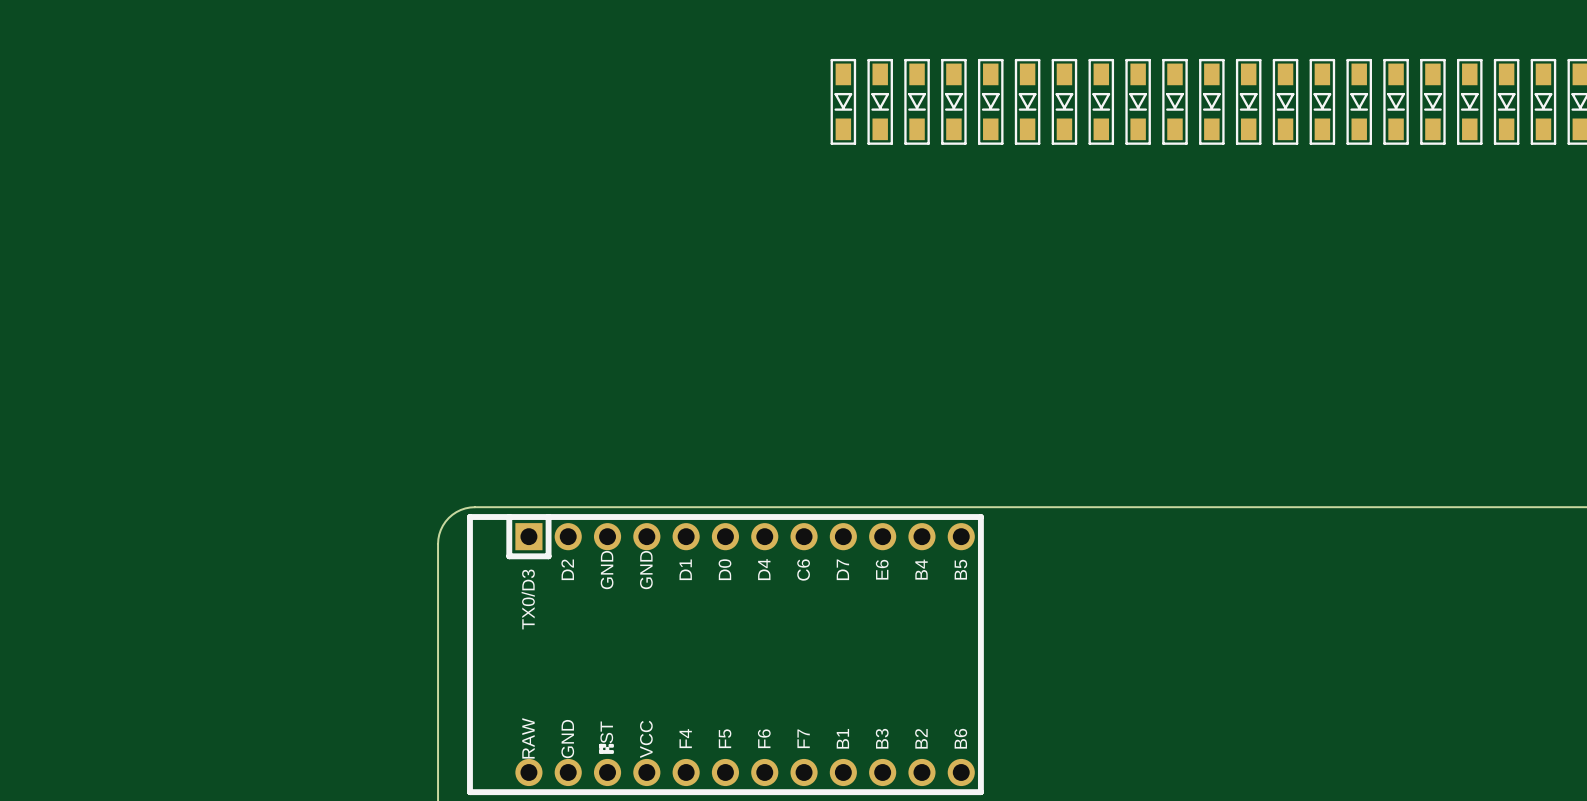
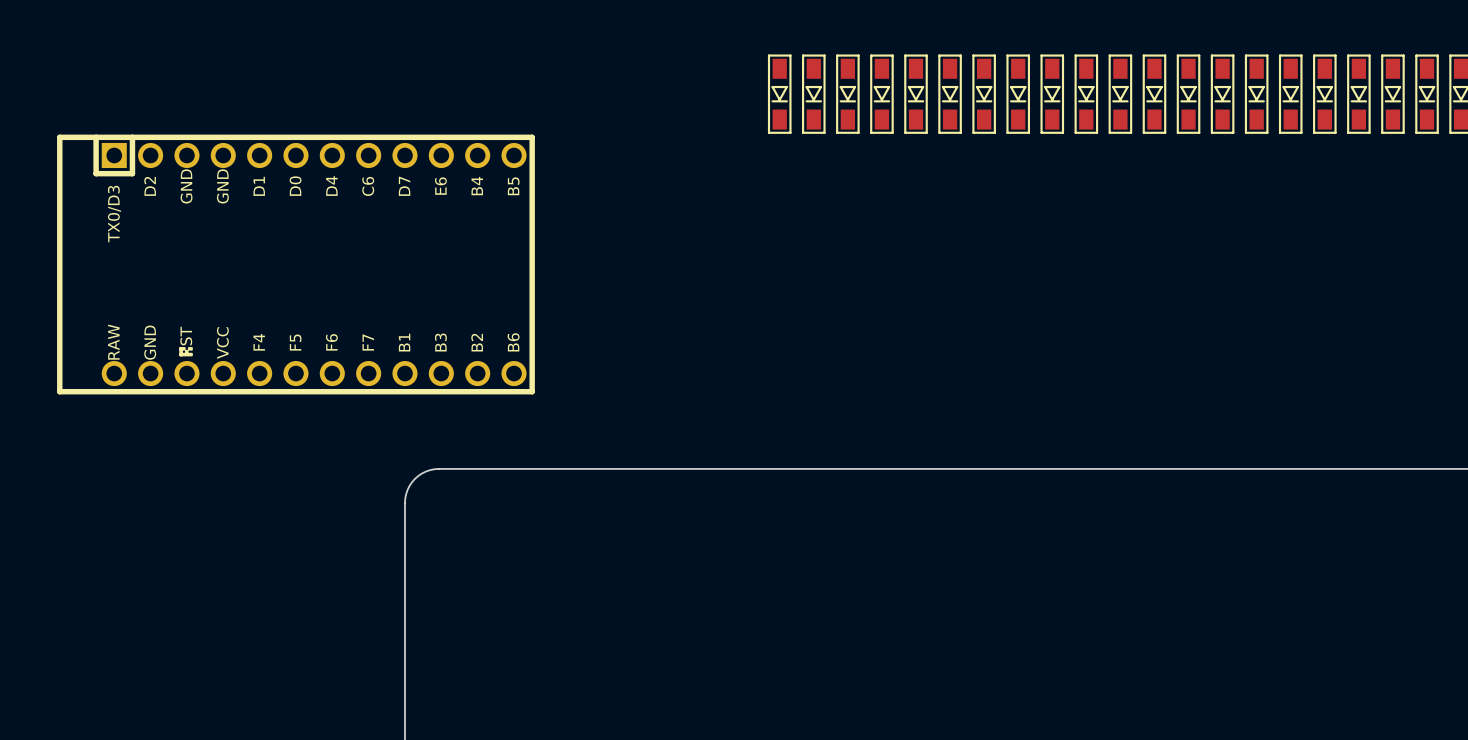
part: none -> (295, 264)
part: (725, 654) -> none

